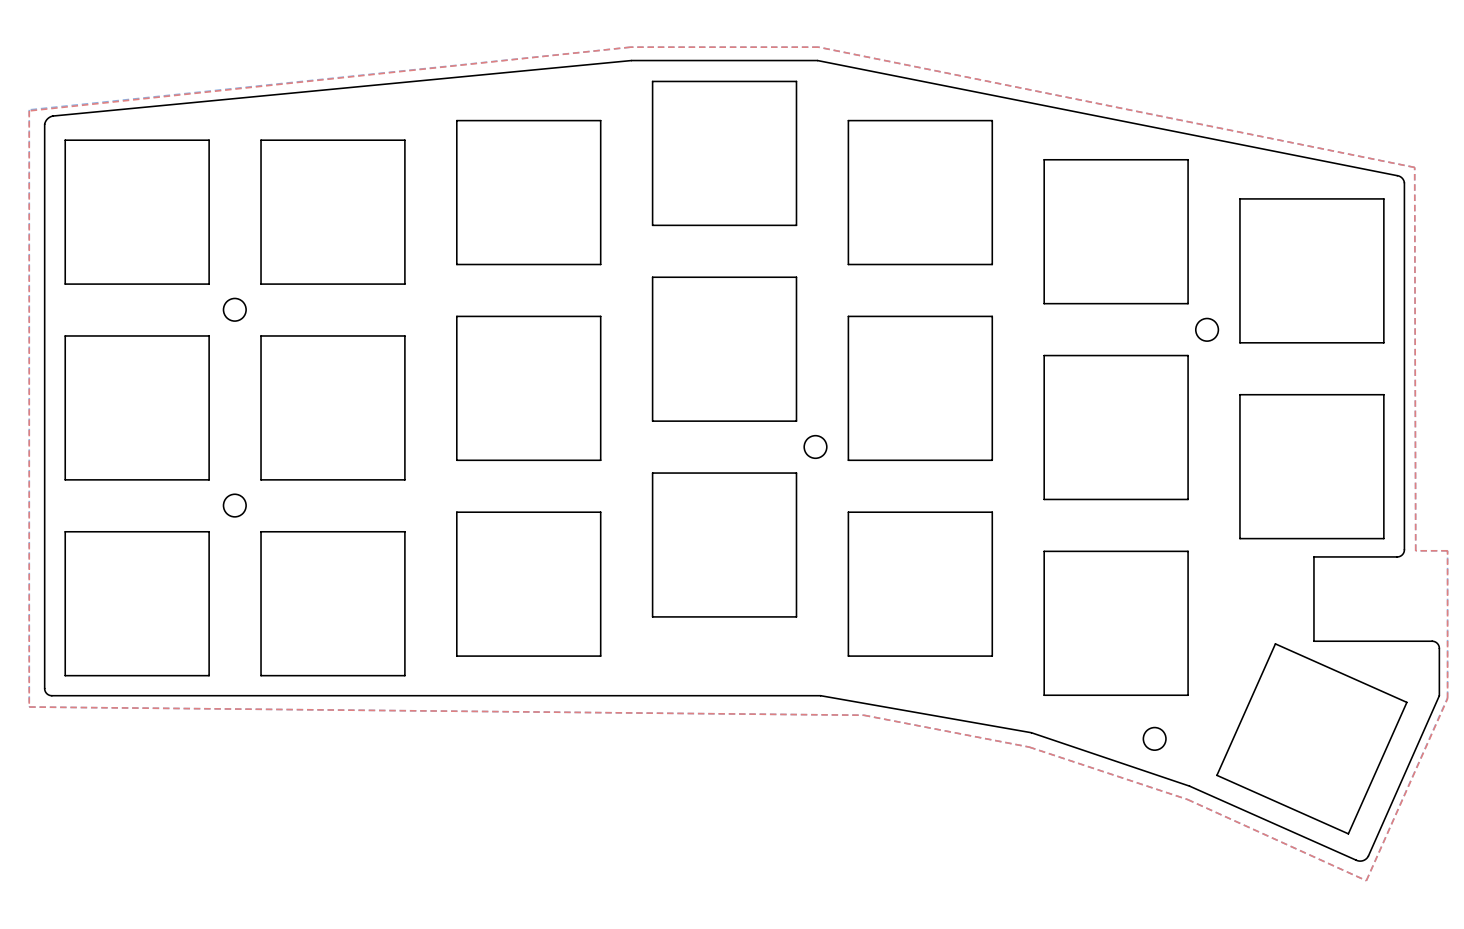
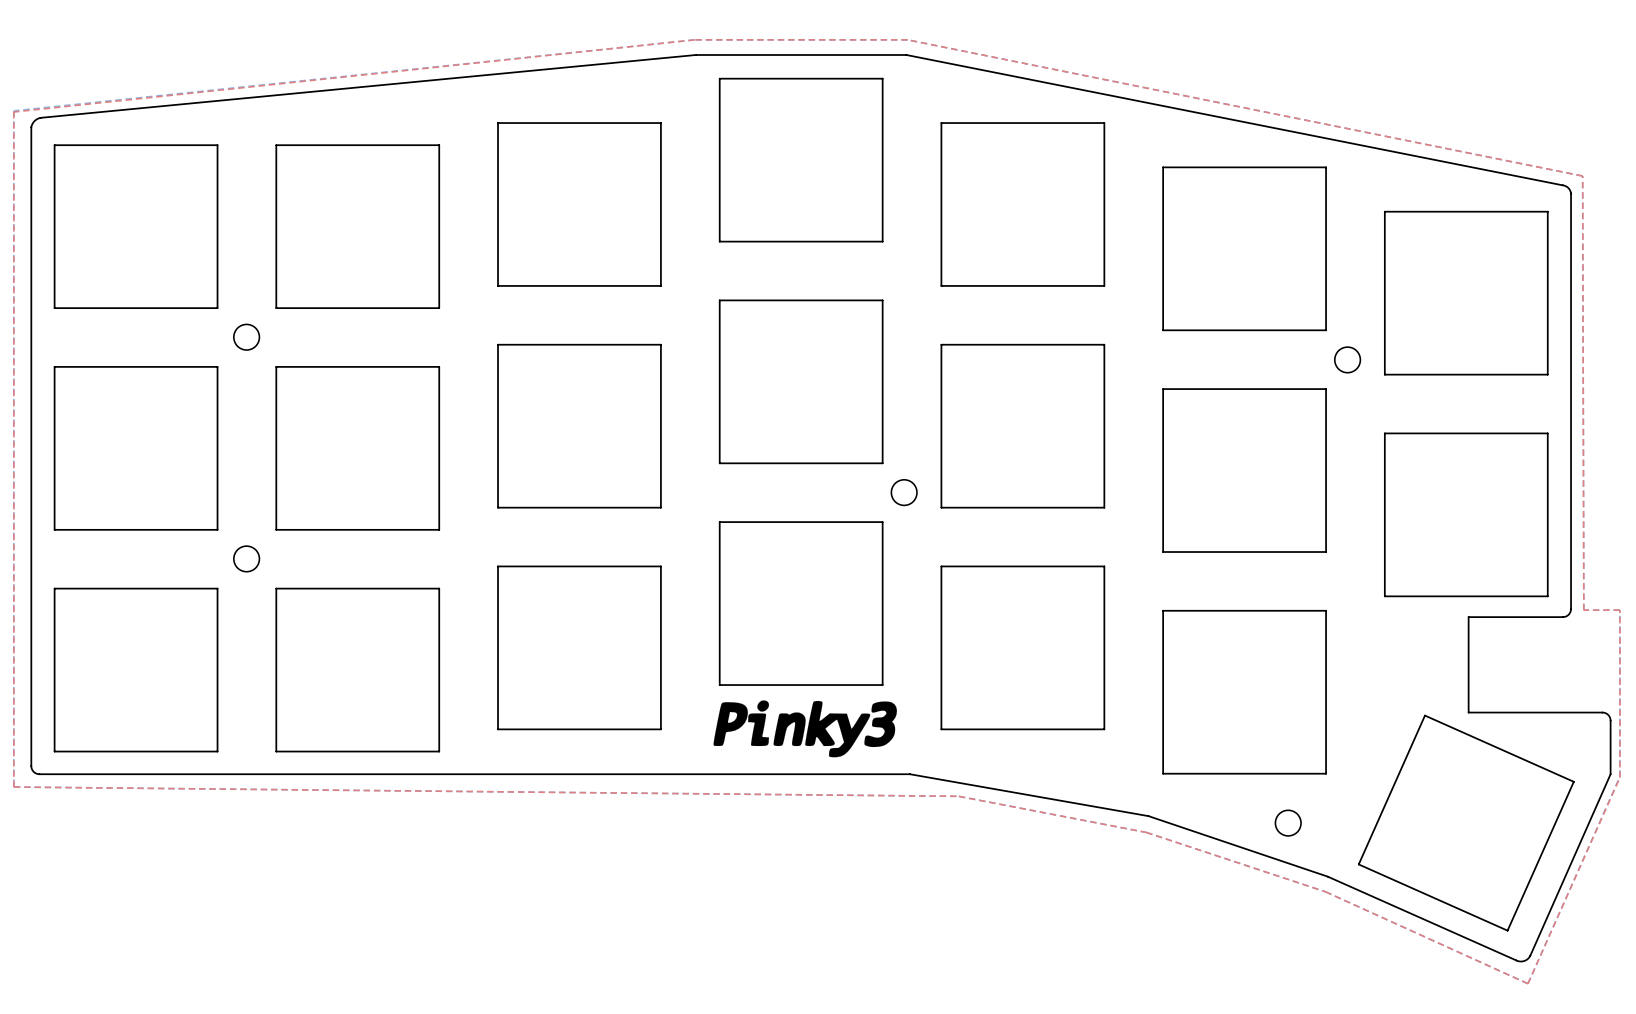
drawing: none -> [713, 700, 897, 758]

